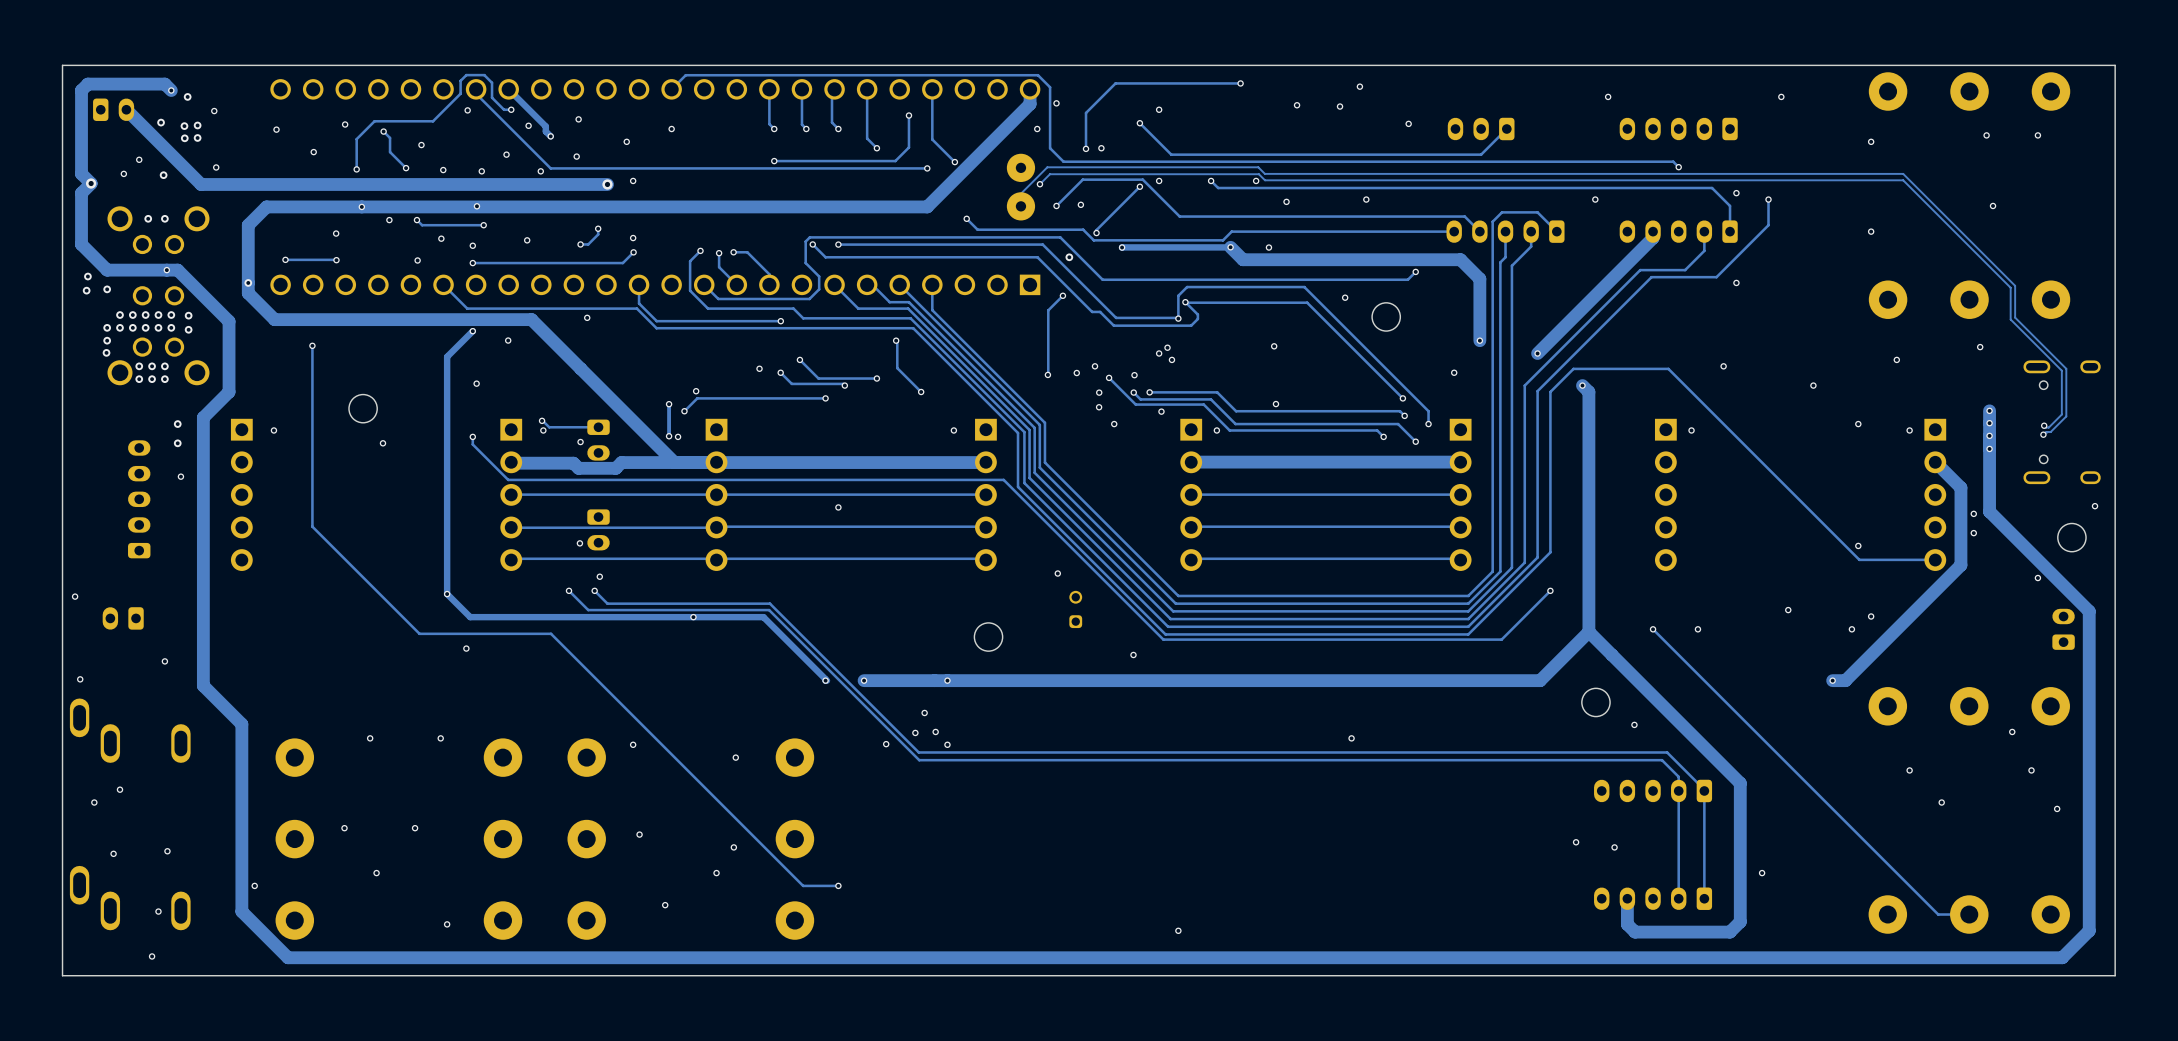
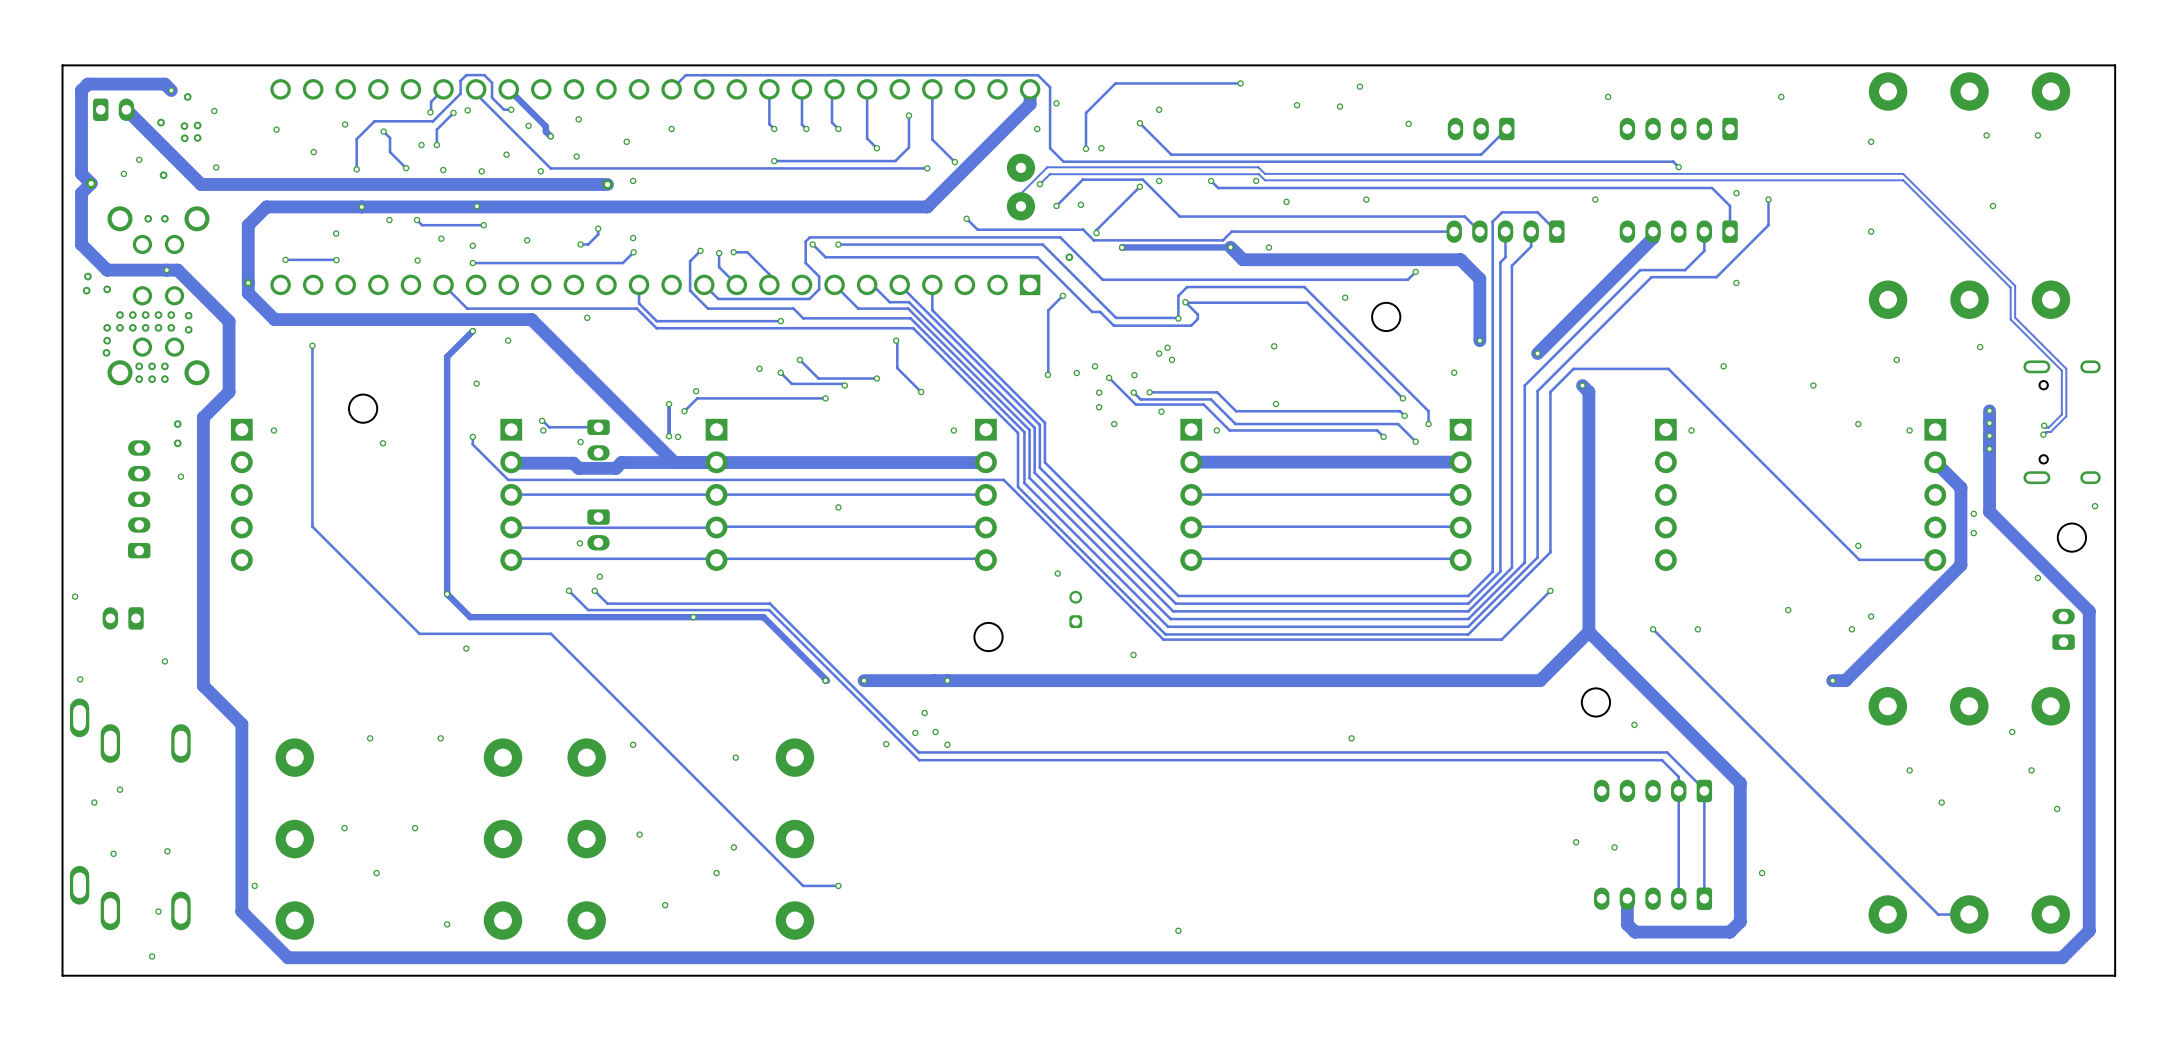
track: none -> (443, 89) (431, 101) (430, 112)
via: none -> (430, 112)
track: none -> (453, 112) (436, 129) (436, 145)
via: none -> (453, 112)
via: none -> (436, 145)

